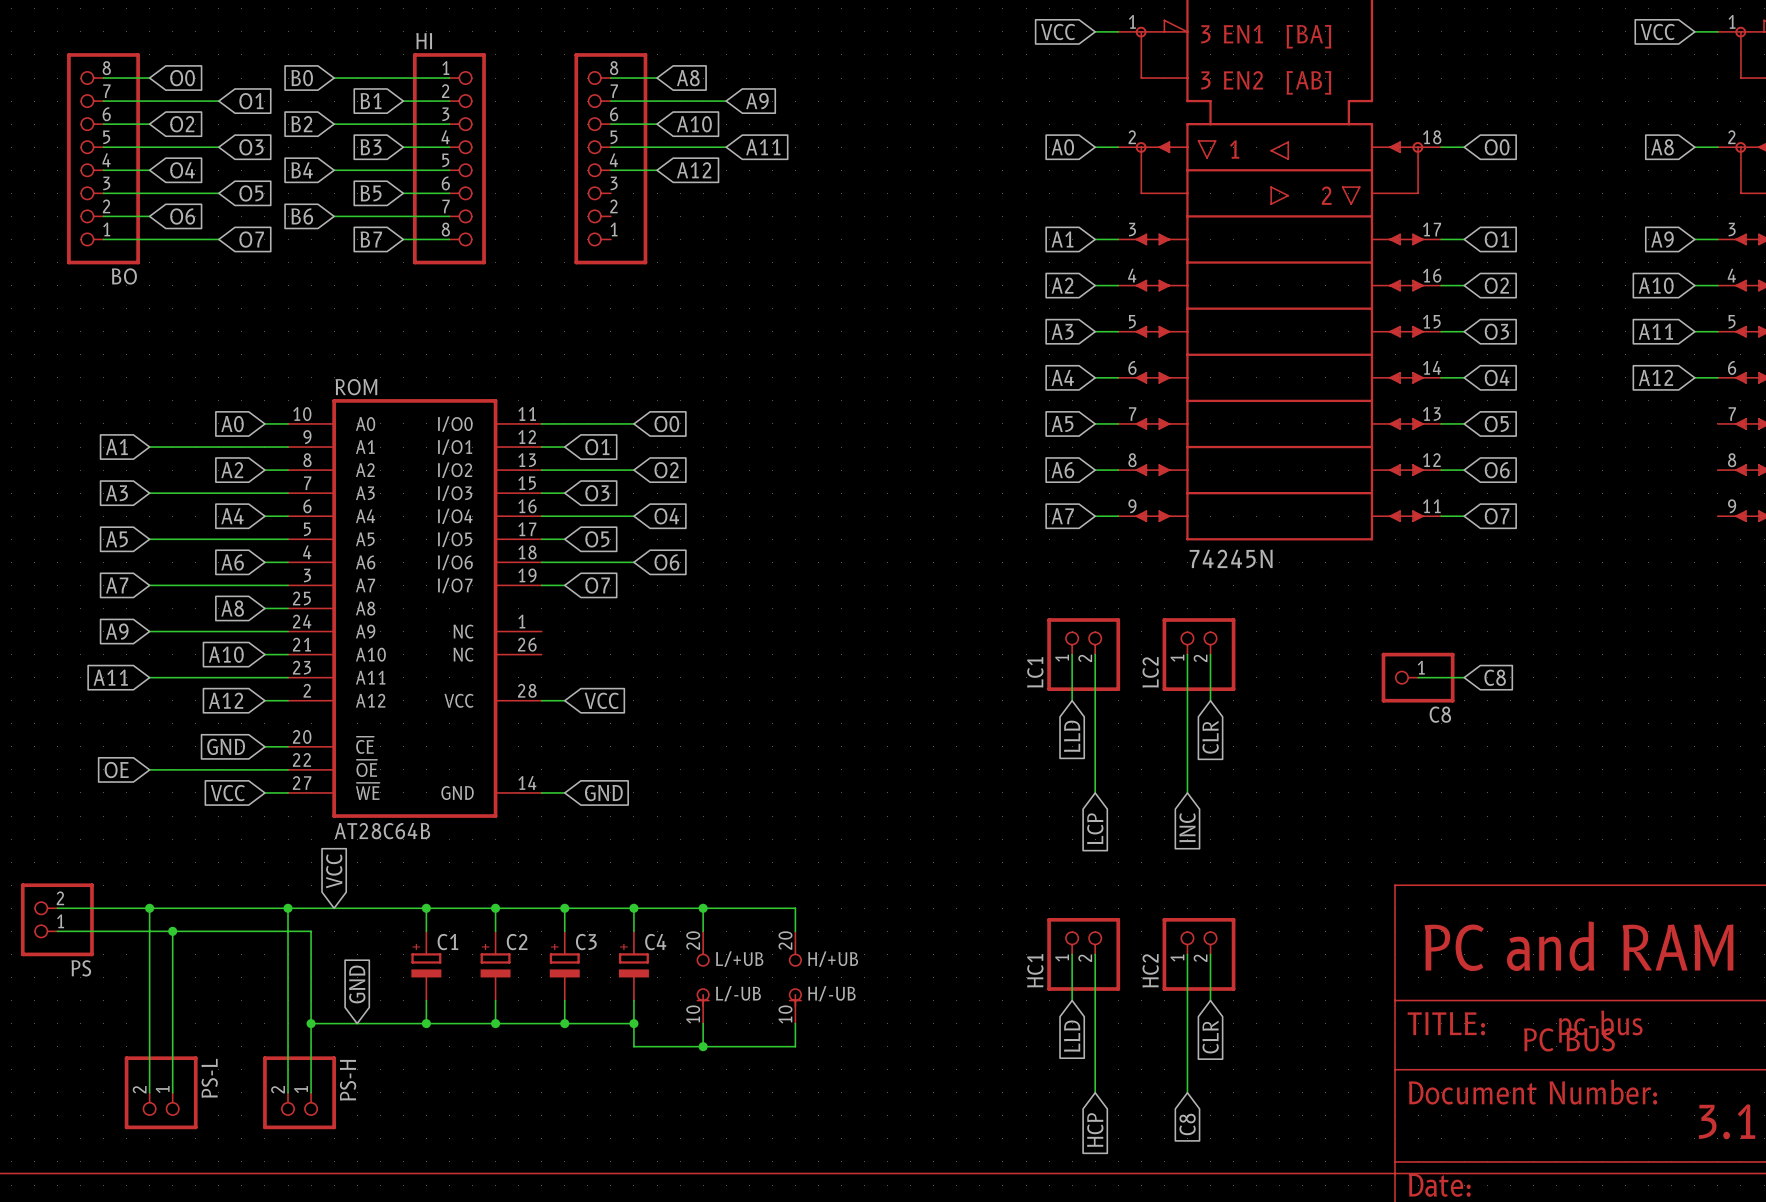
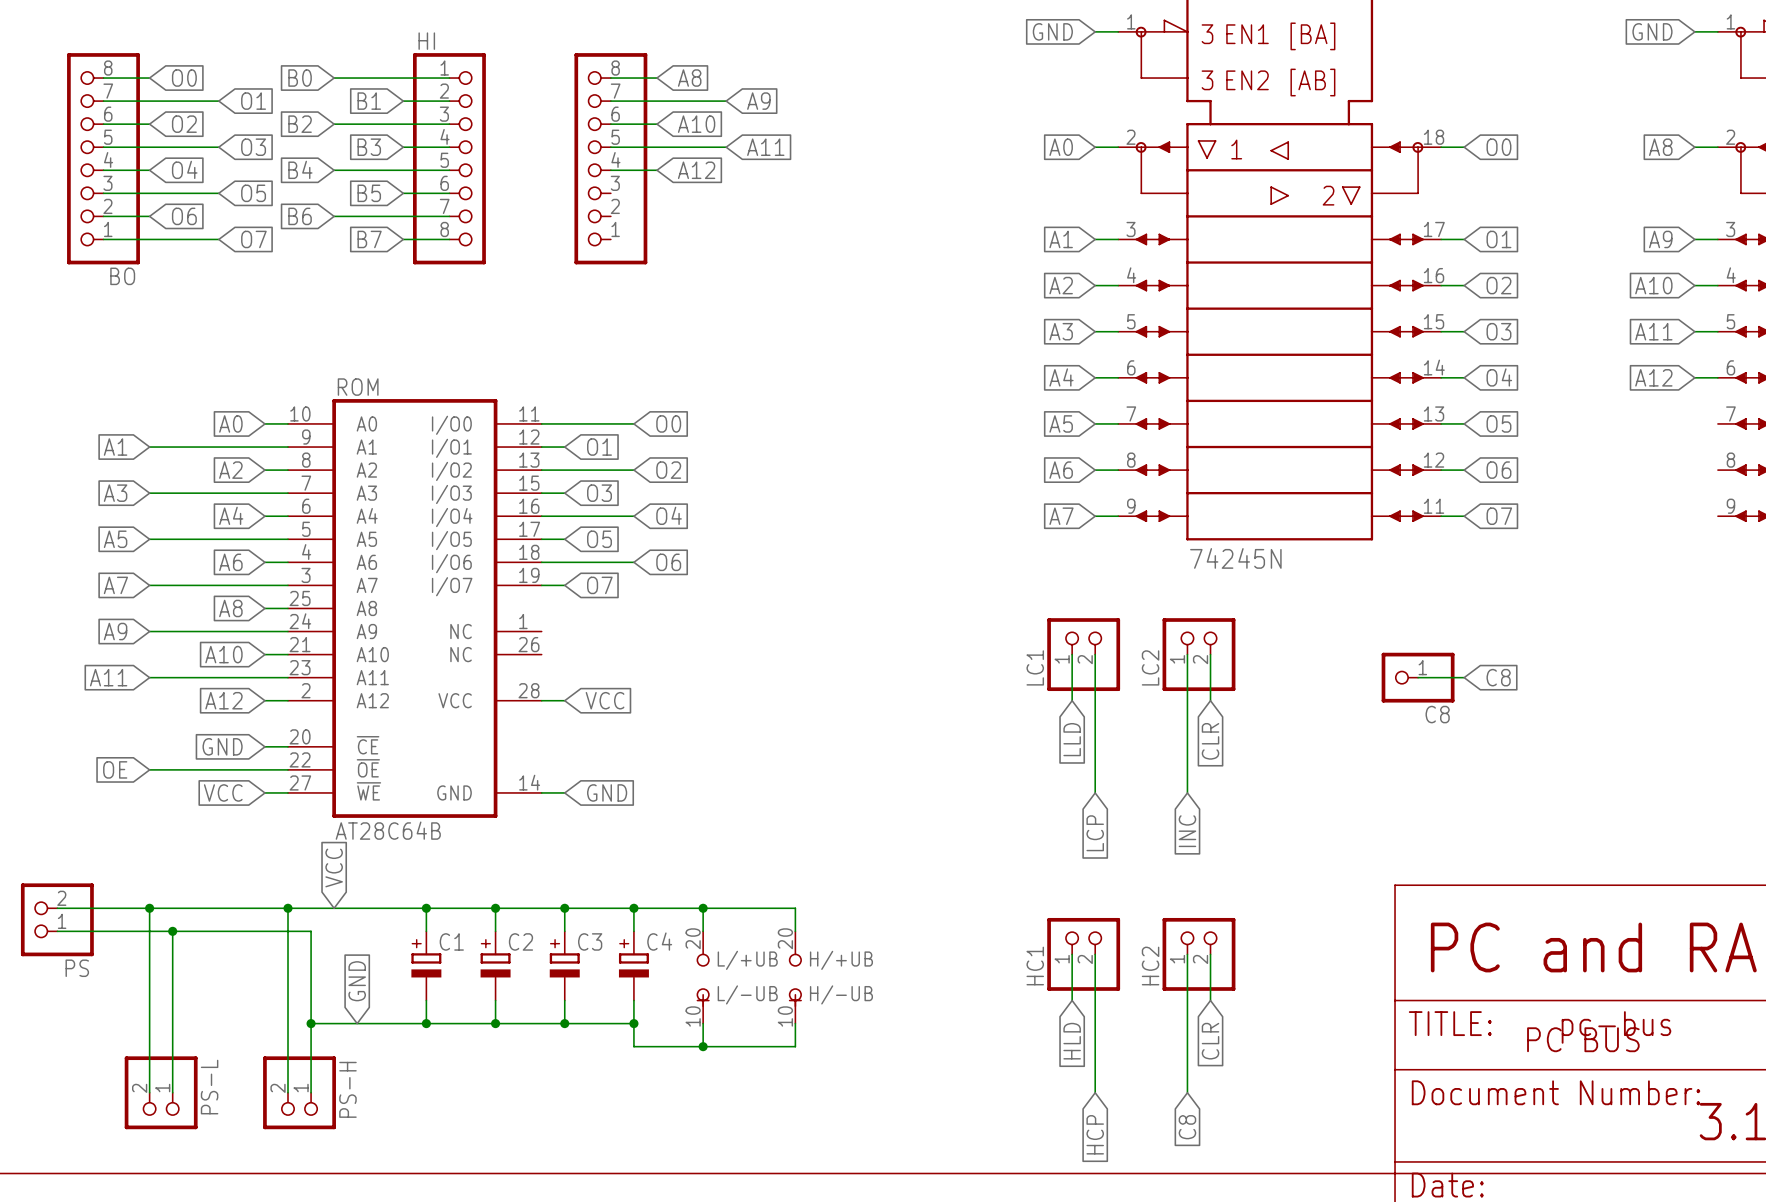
global label: VCC (1058, 32) -> GND (1052, 31)
global label: VCC (1657, 32) -> GND (1652, 31)
global label: LLD (1072, 1036) -> HLD (1072, 1041)

